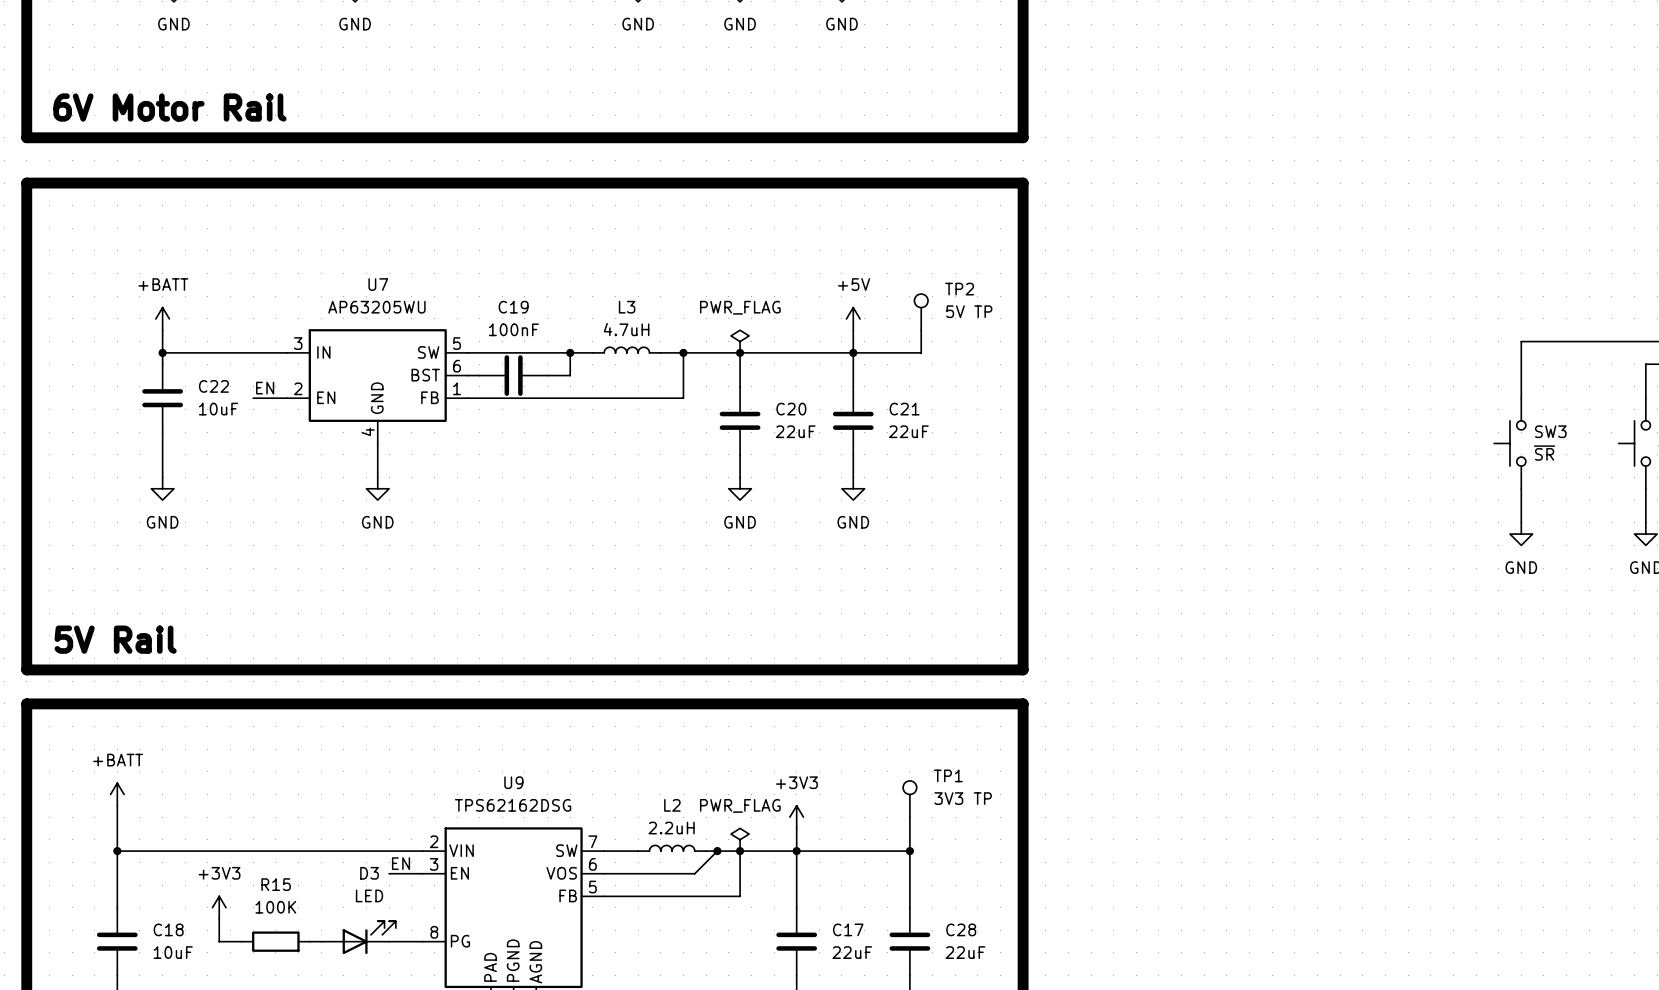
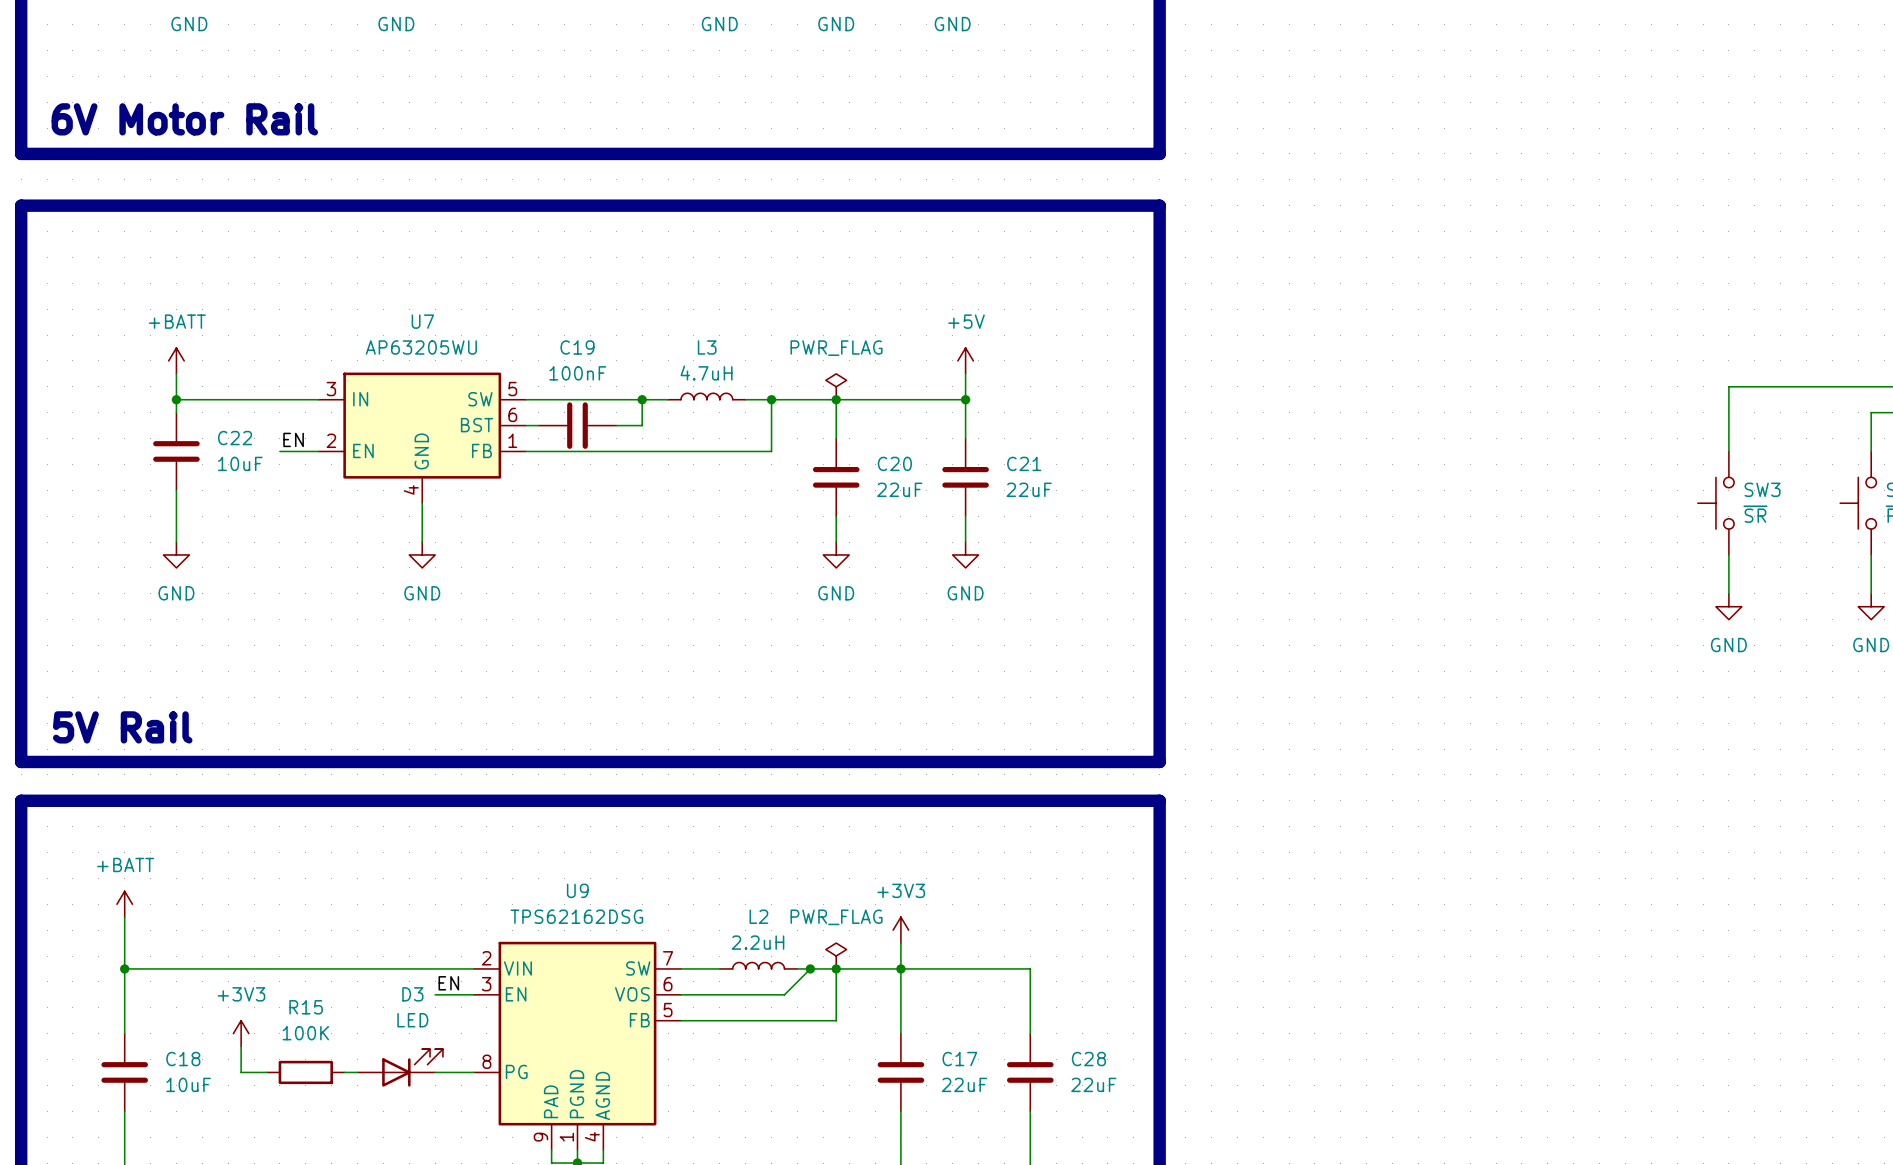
TP2: 5V TP (921, 312) -> none
wire: (921, 330) (921, 352) (853, 352) -> none
TP1: 3V3 TP (909, 799) -> none
wire: (909, 817) (909, 851) -> none
junction: (909, 851) -> none

